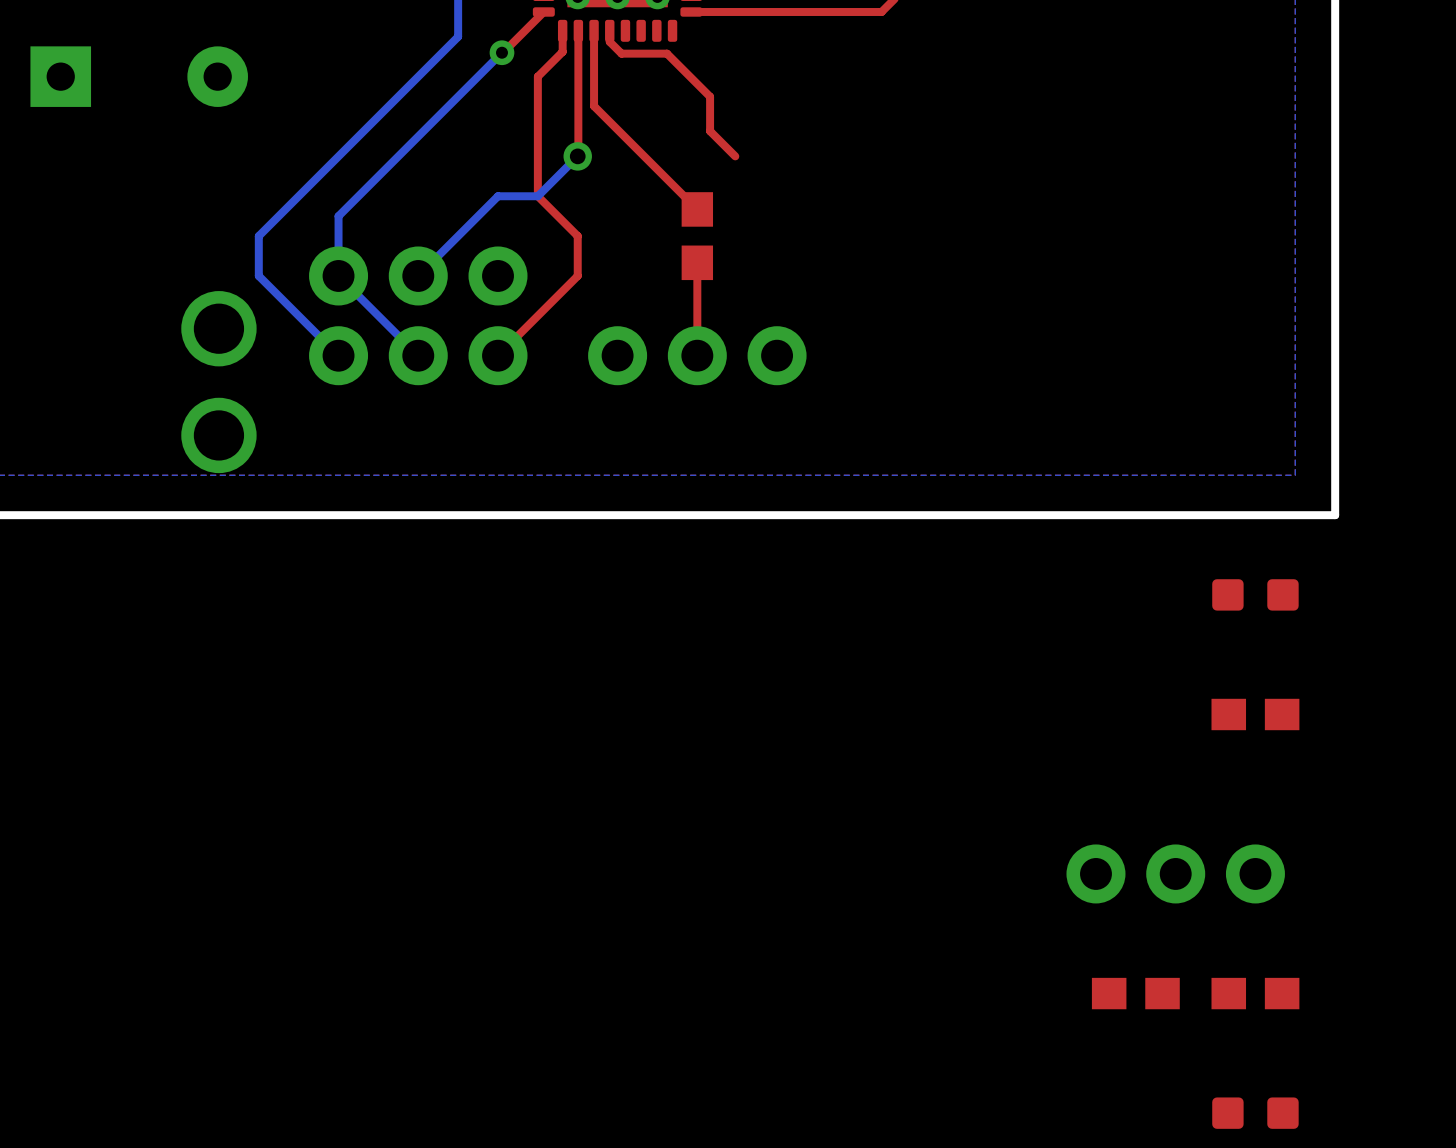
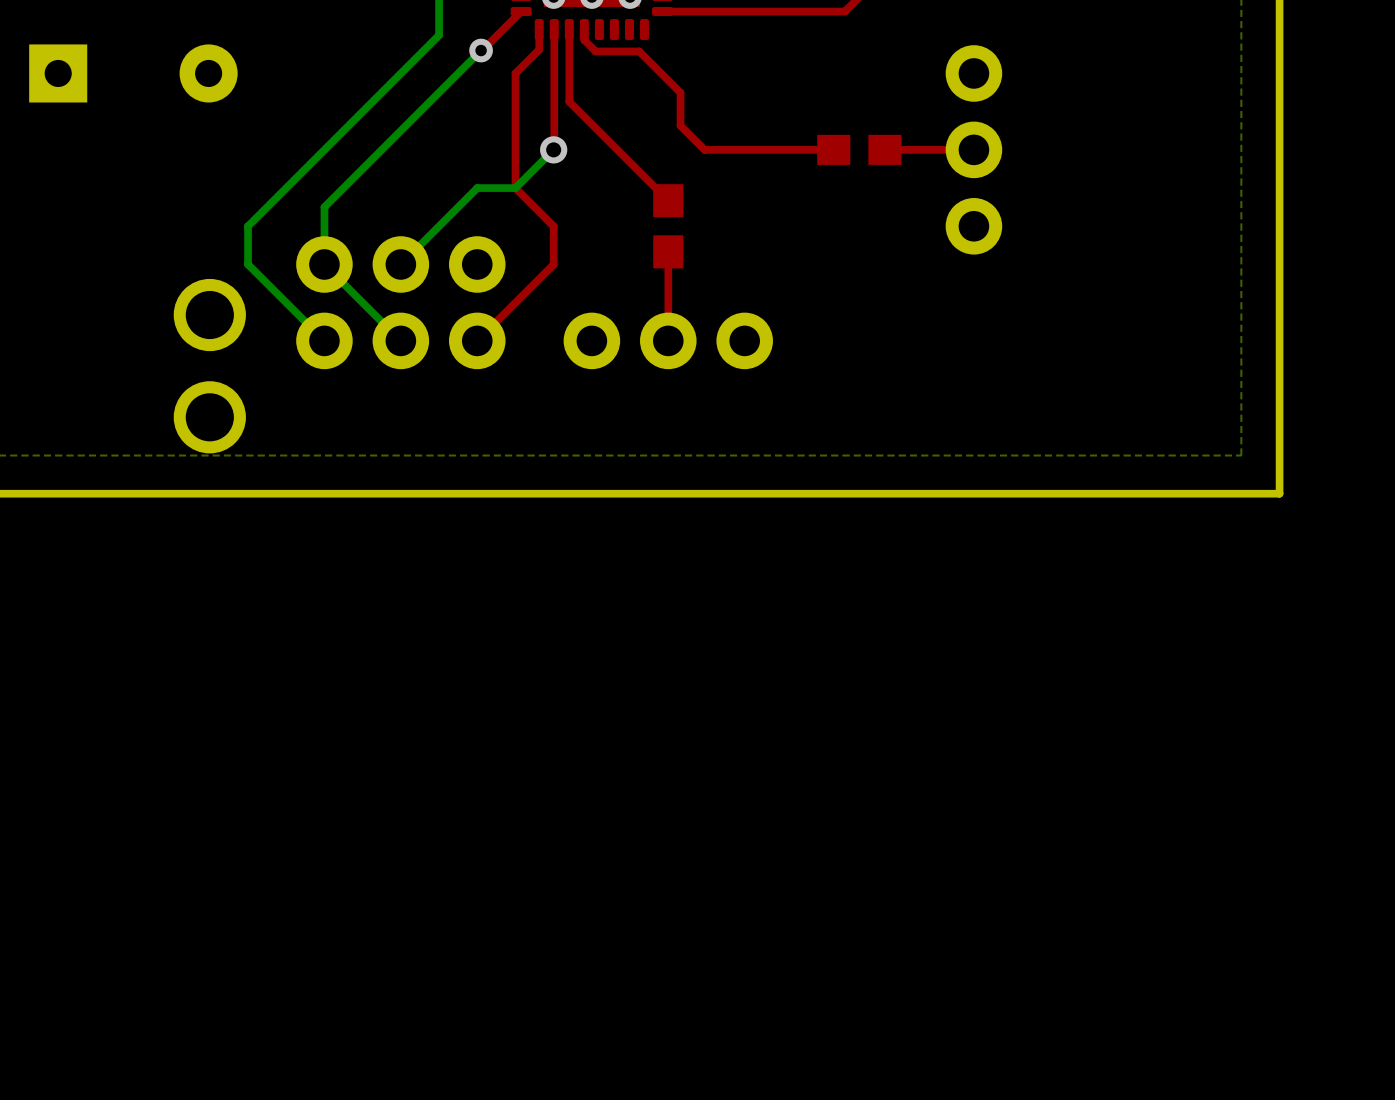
top track: none -> (833, 149) (704, 149)
part: none -> (859, 149)
top track: none -> (973, 149) (884, 149)
part: (1255, 594) -> none
part: (1255, 714) -> none
part rotation: 0° (1175, 873) -> 90° clockwise (973, 149)
part position: (1175, 873) -> (973, 149)
part: (1135, 993) -> none
part: (1255, 993) -> none
part: (1255, 1113) -> none

